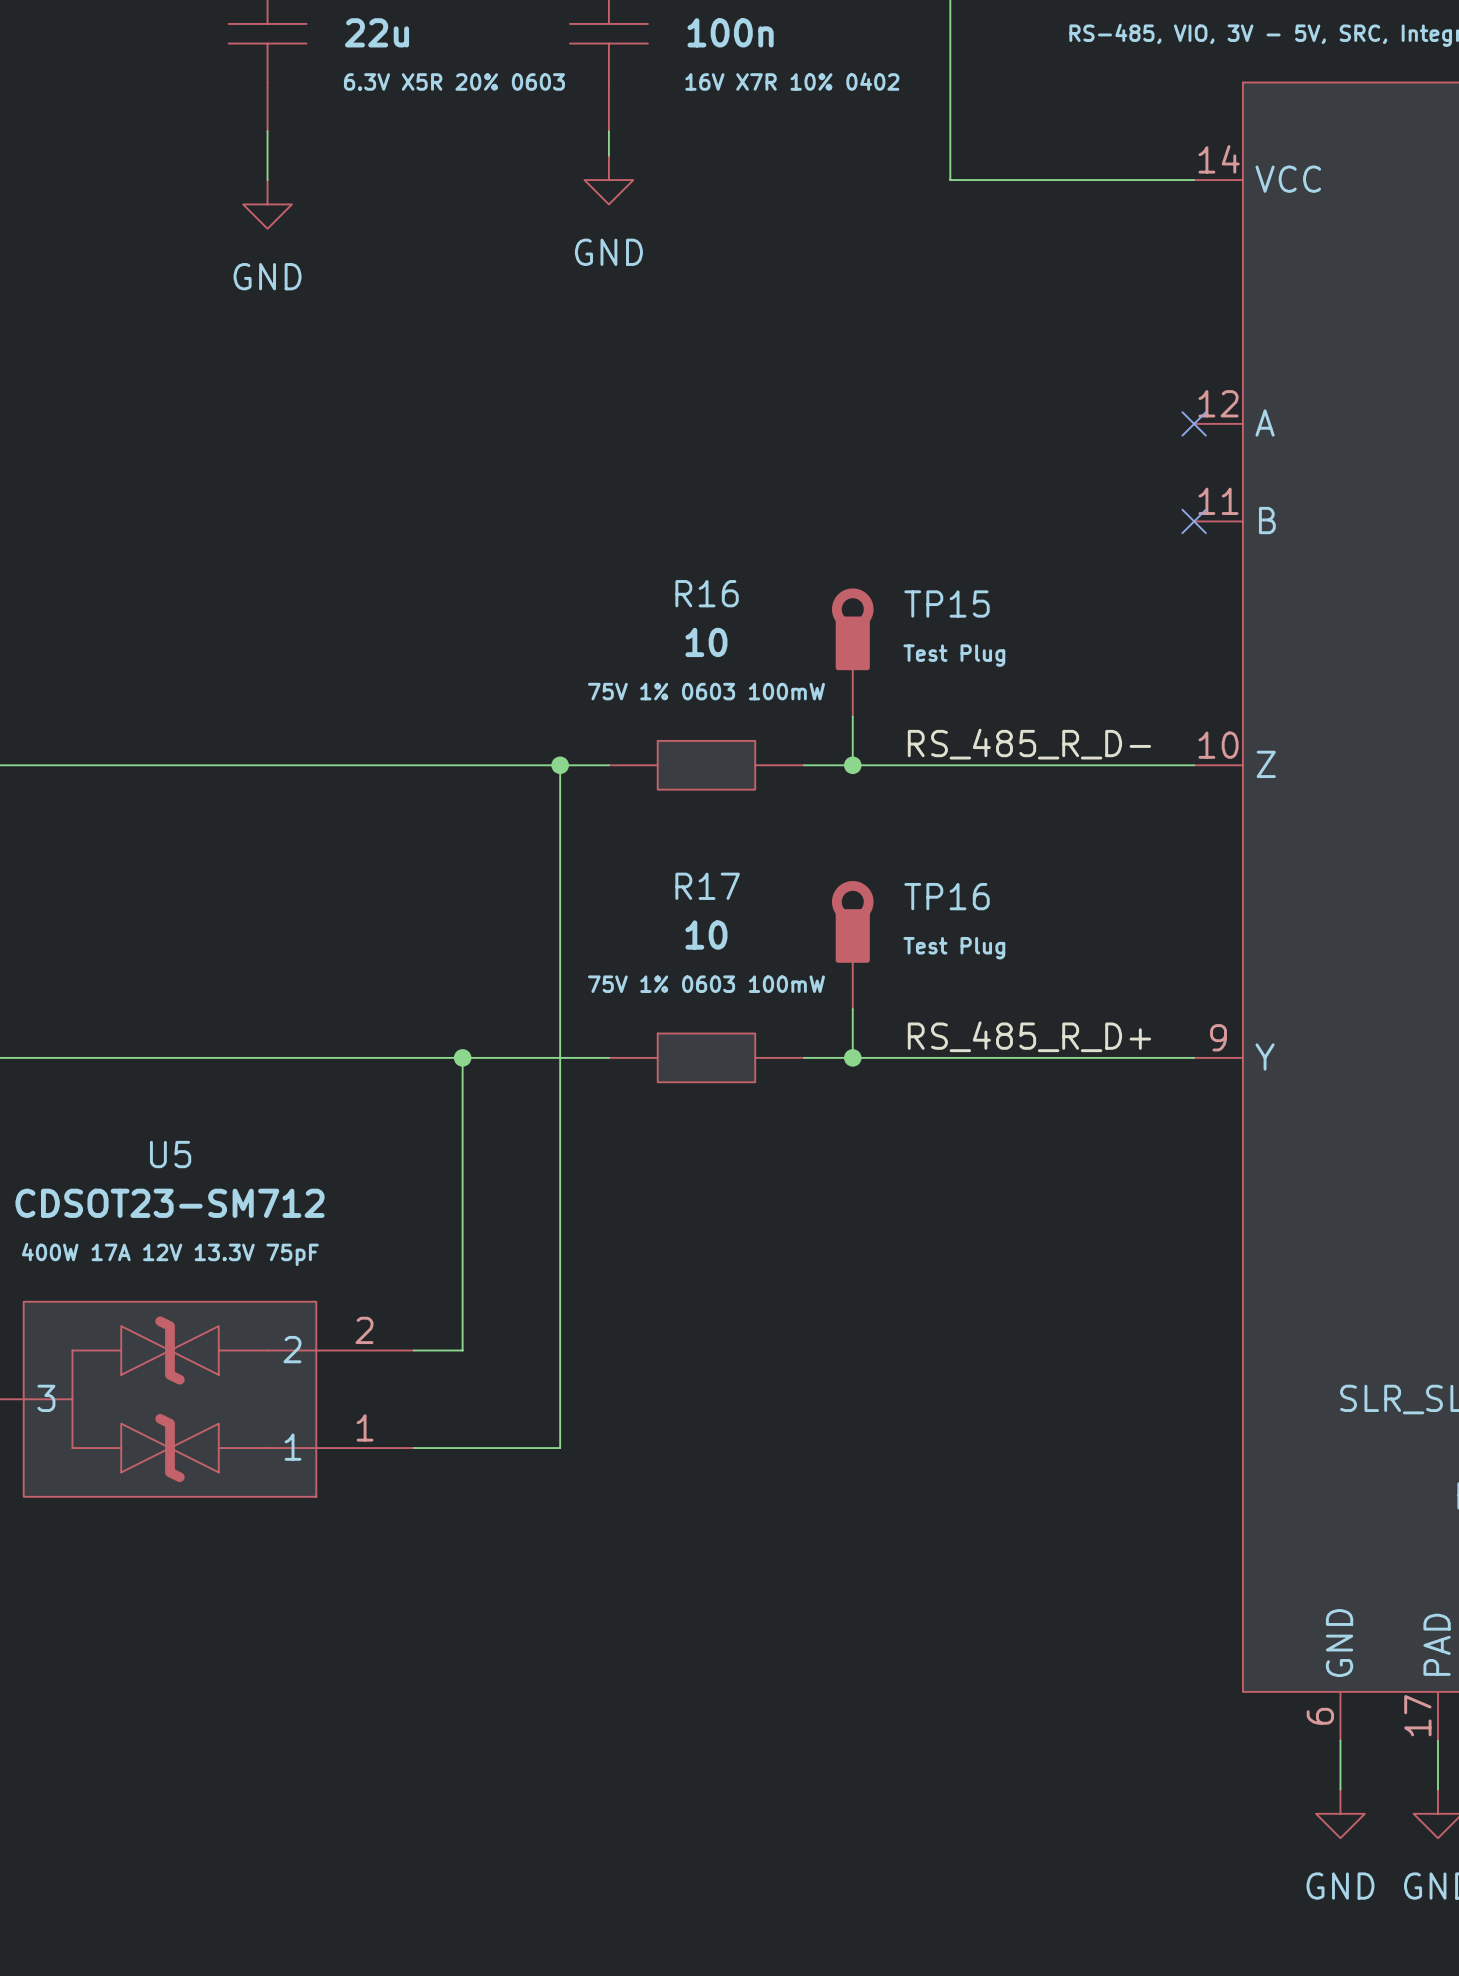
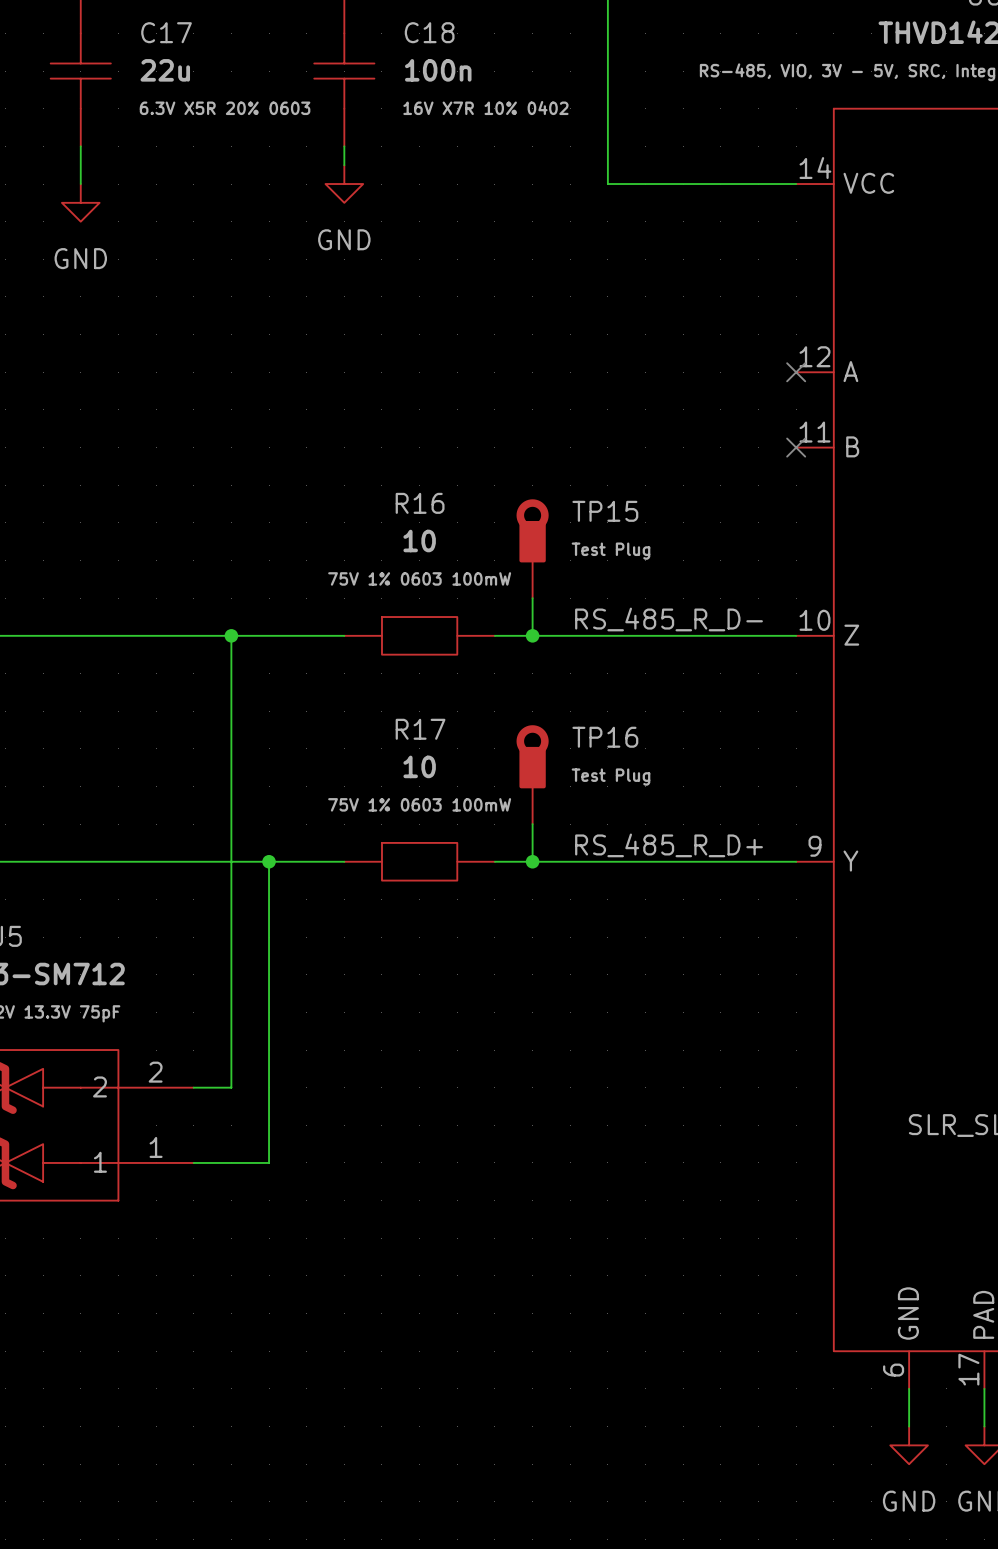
wire: none -> (231, 635) (231, 861)
wire: (560, 765) (560, 1448) (511, 1448) -> (269, 861) (269, 1162)
junction position: (560, 765) -> (231, 635)
junction position: (462, 1057) -> (269, 861)

